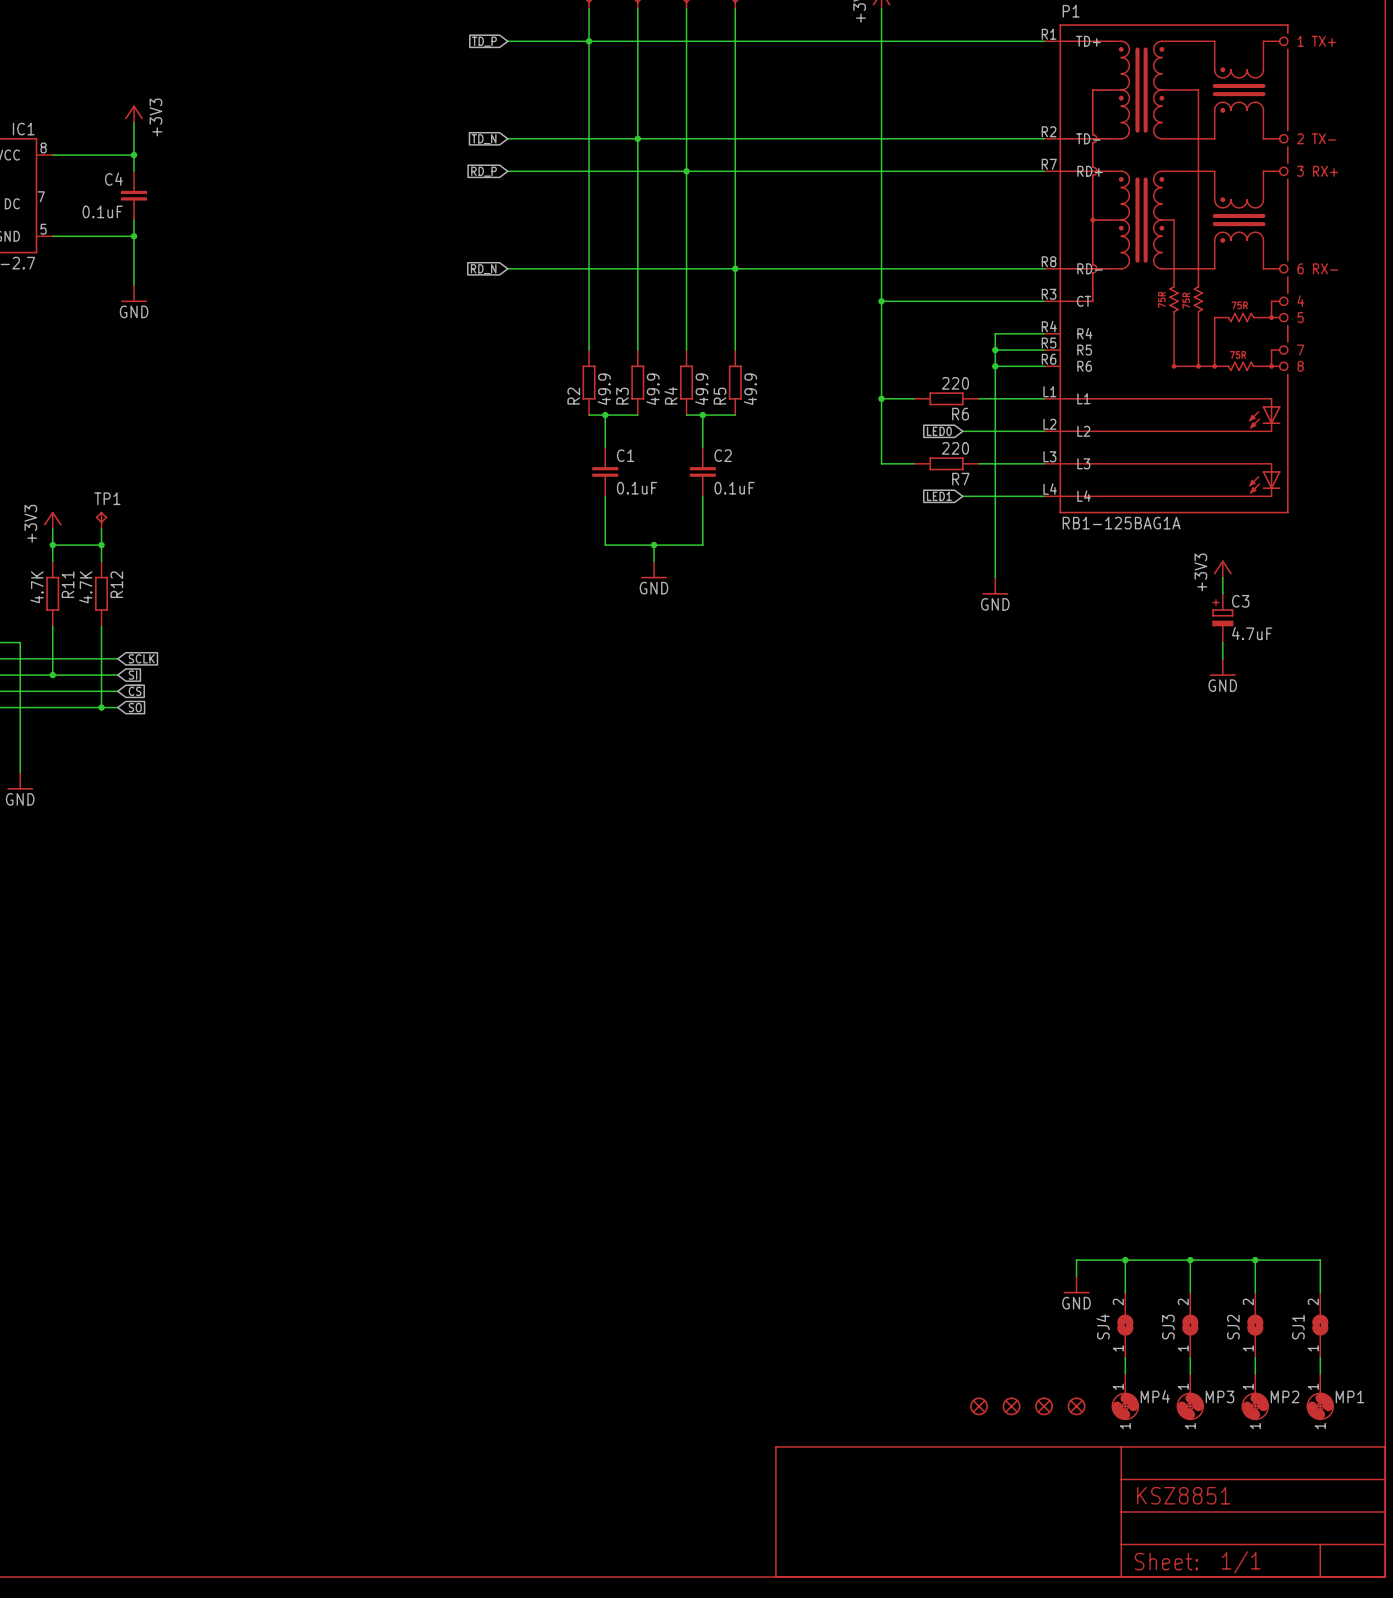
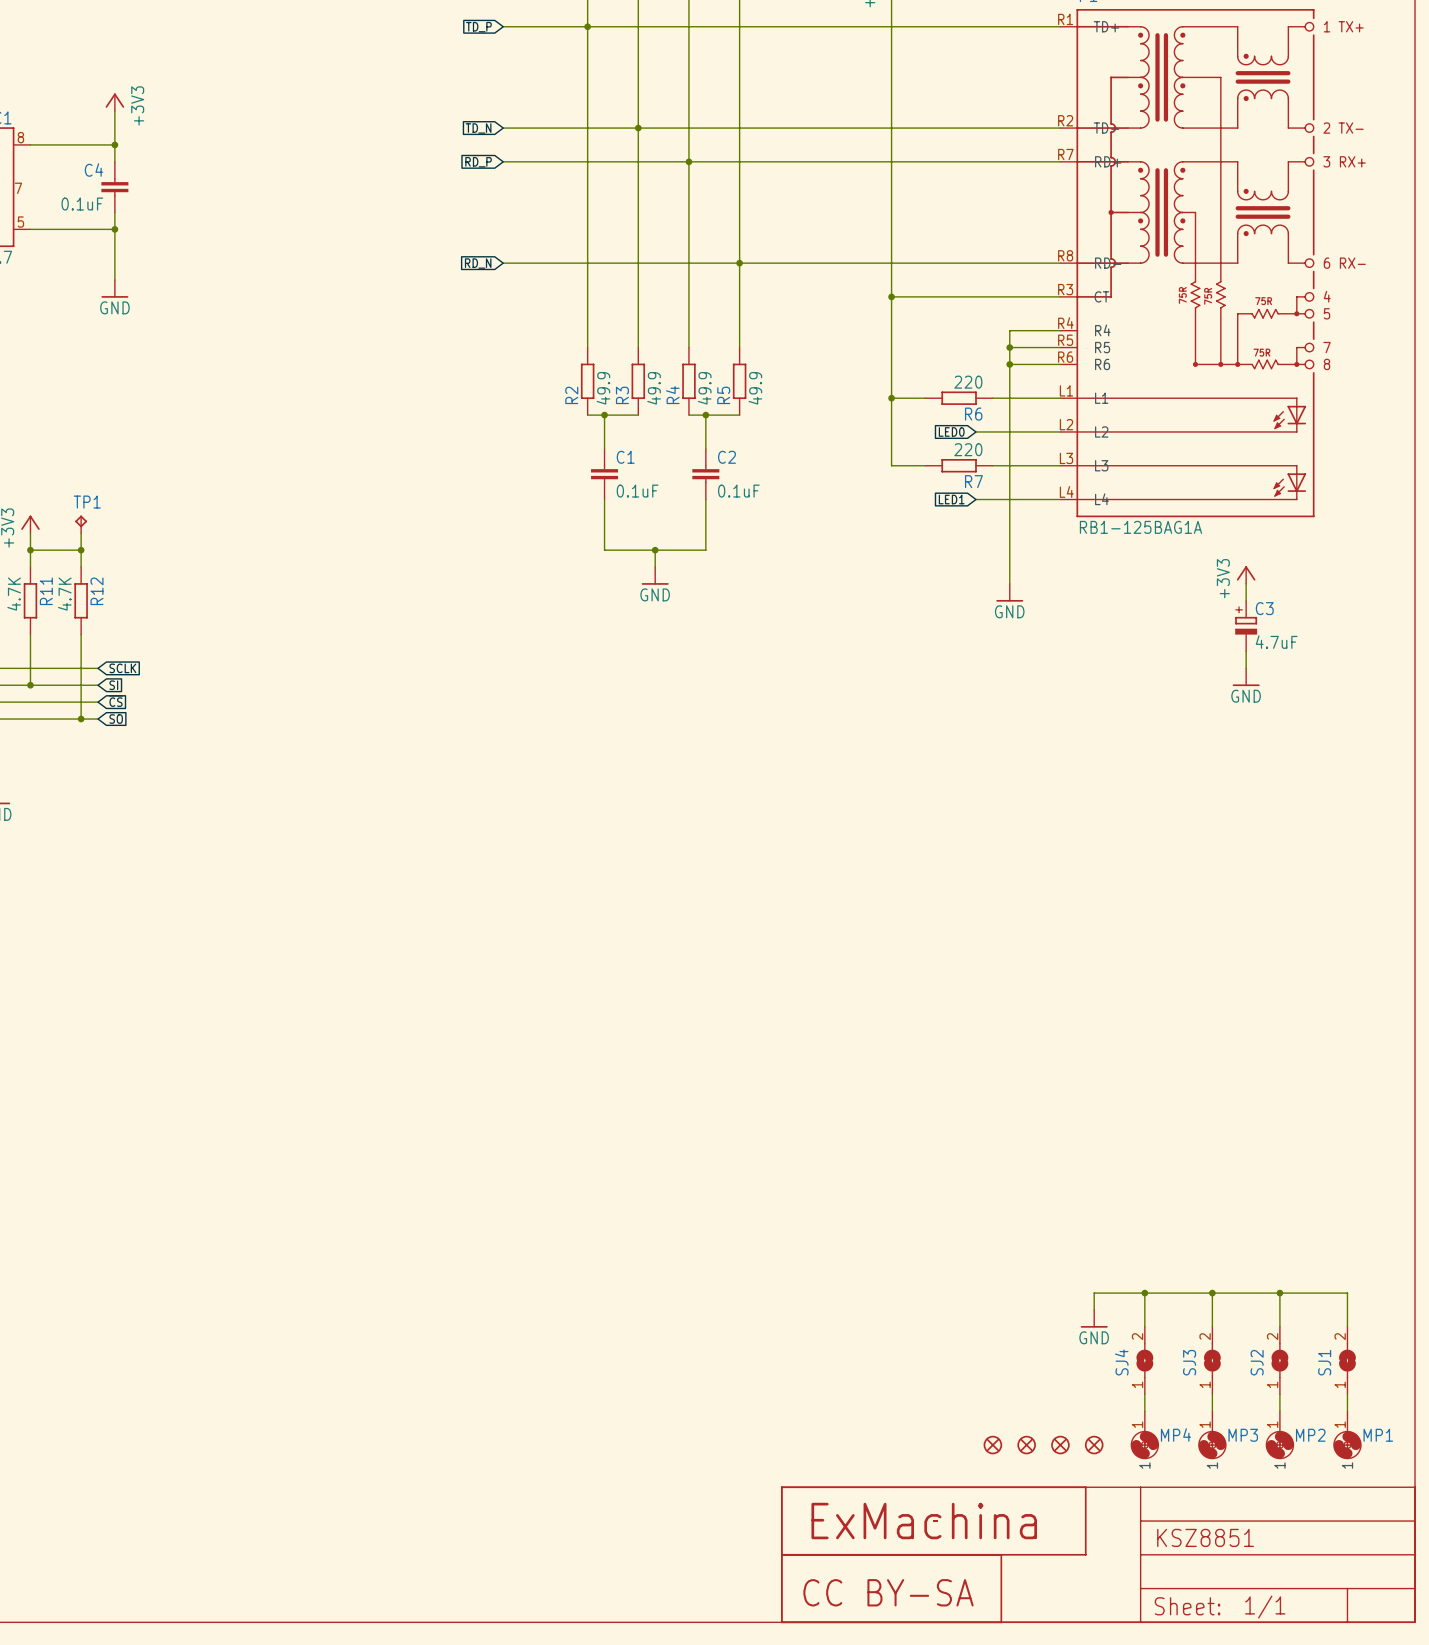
part: none -> (933, 1521)
part: none -> (891, 1588)

